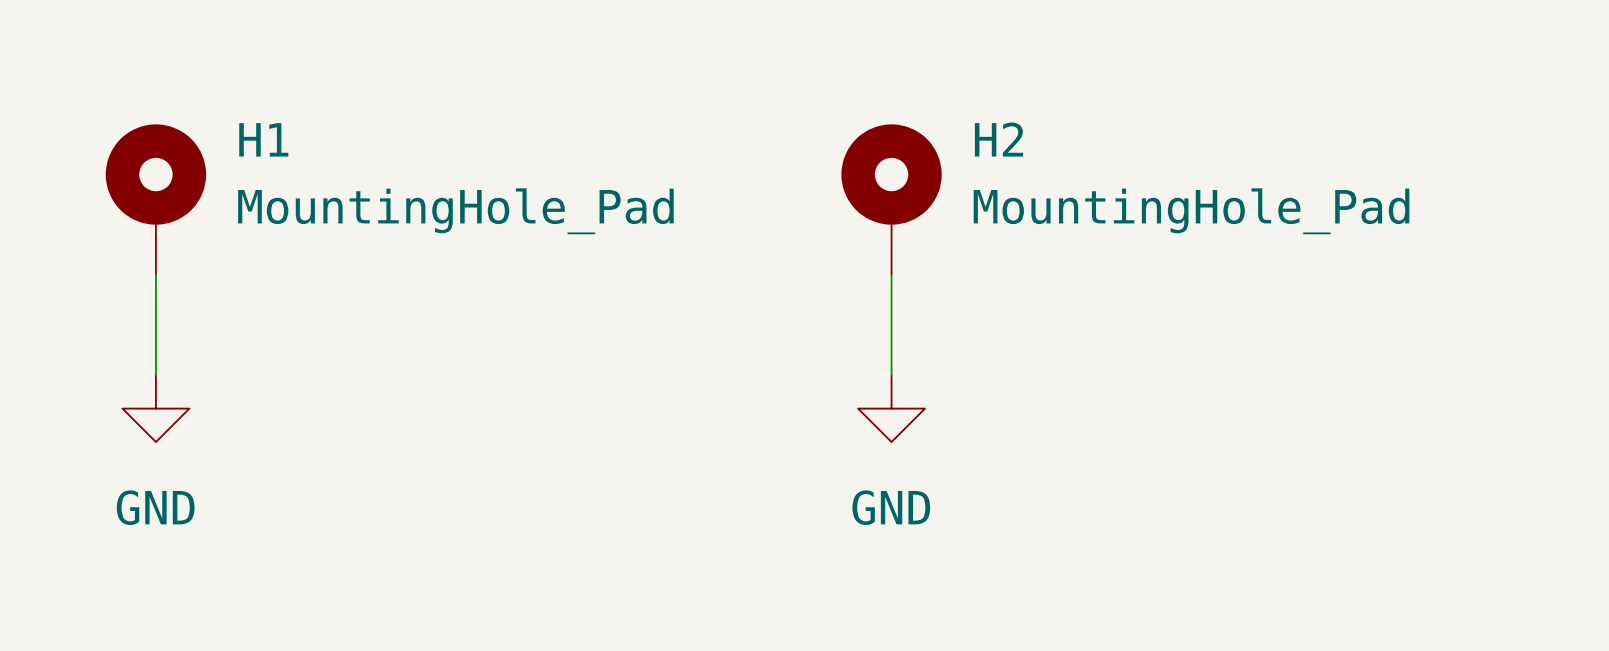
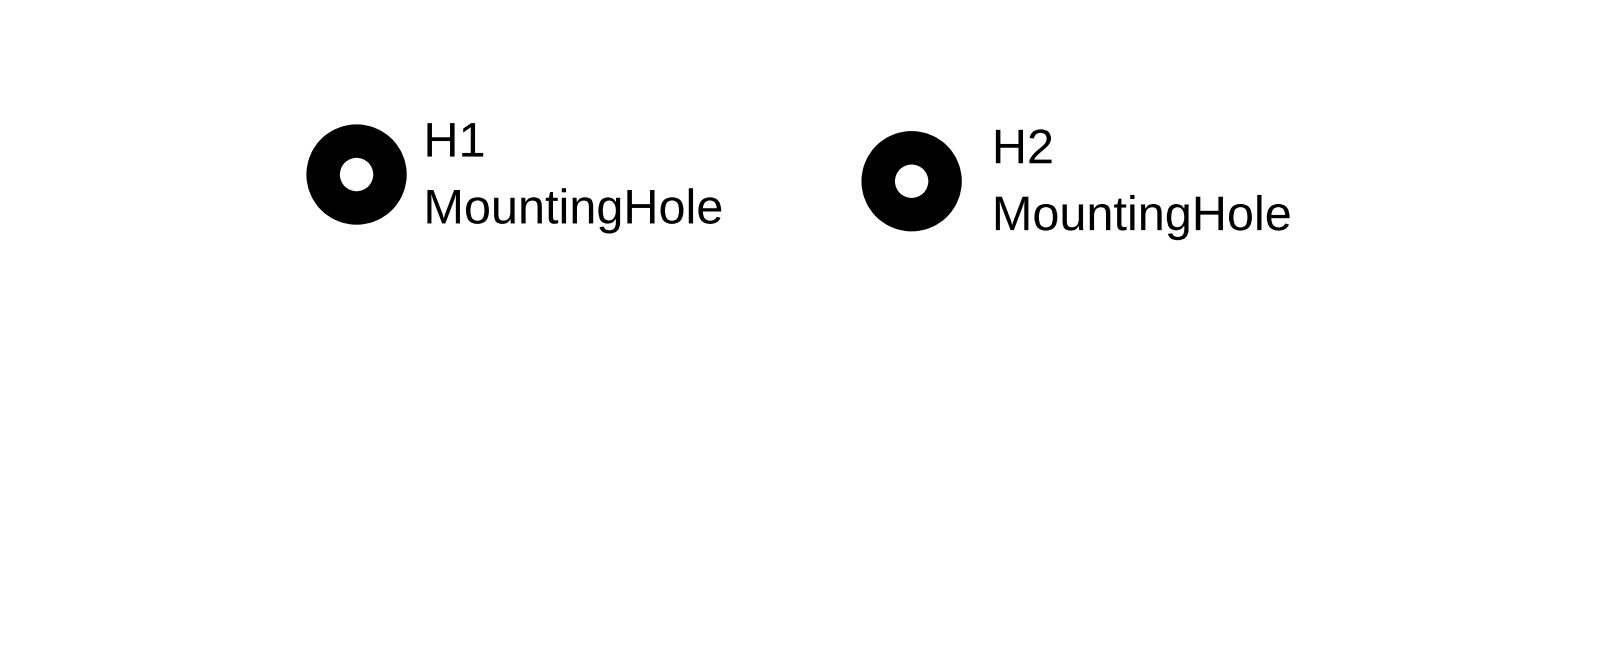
H1 symbol: [105, 124, 207, 275] -> [306, 124, 407, 225]
H2 symbol: [841, 124, 942, 275] -> [861, 131, 962, 232]
H1 value: MountingHole_Pad (455, 211) -> MountingHole (574, 210)
H2 value: MountingHole_Pad (1191, 211) -> MountingHole (1142, 217)
wire: (155, 274) (155, 375) -> none
wire: (891, 274) (891, 375) -> none
power symbol: GND (155, 408) -> none
power symbol: GND (891, 408) -> none

